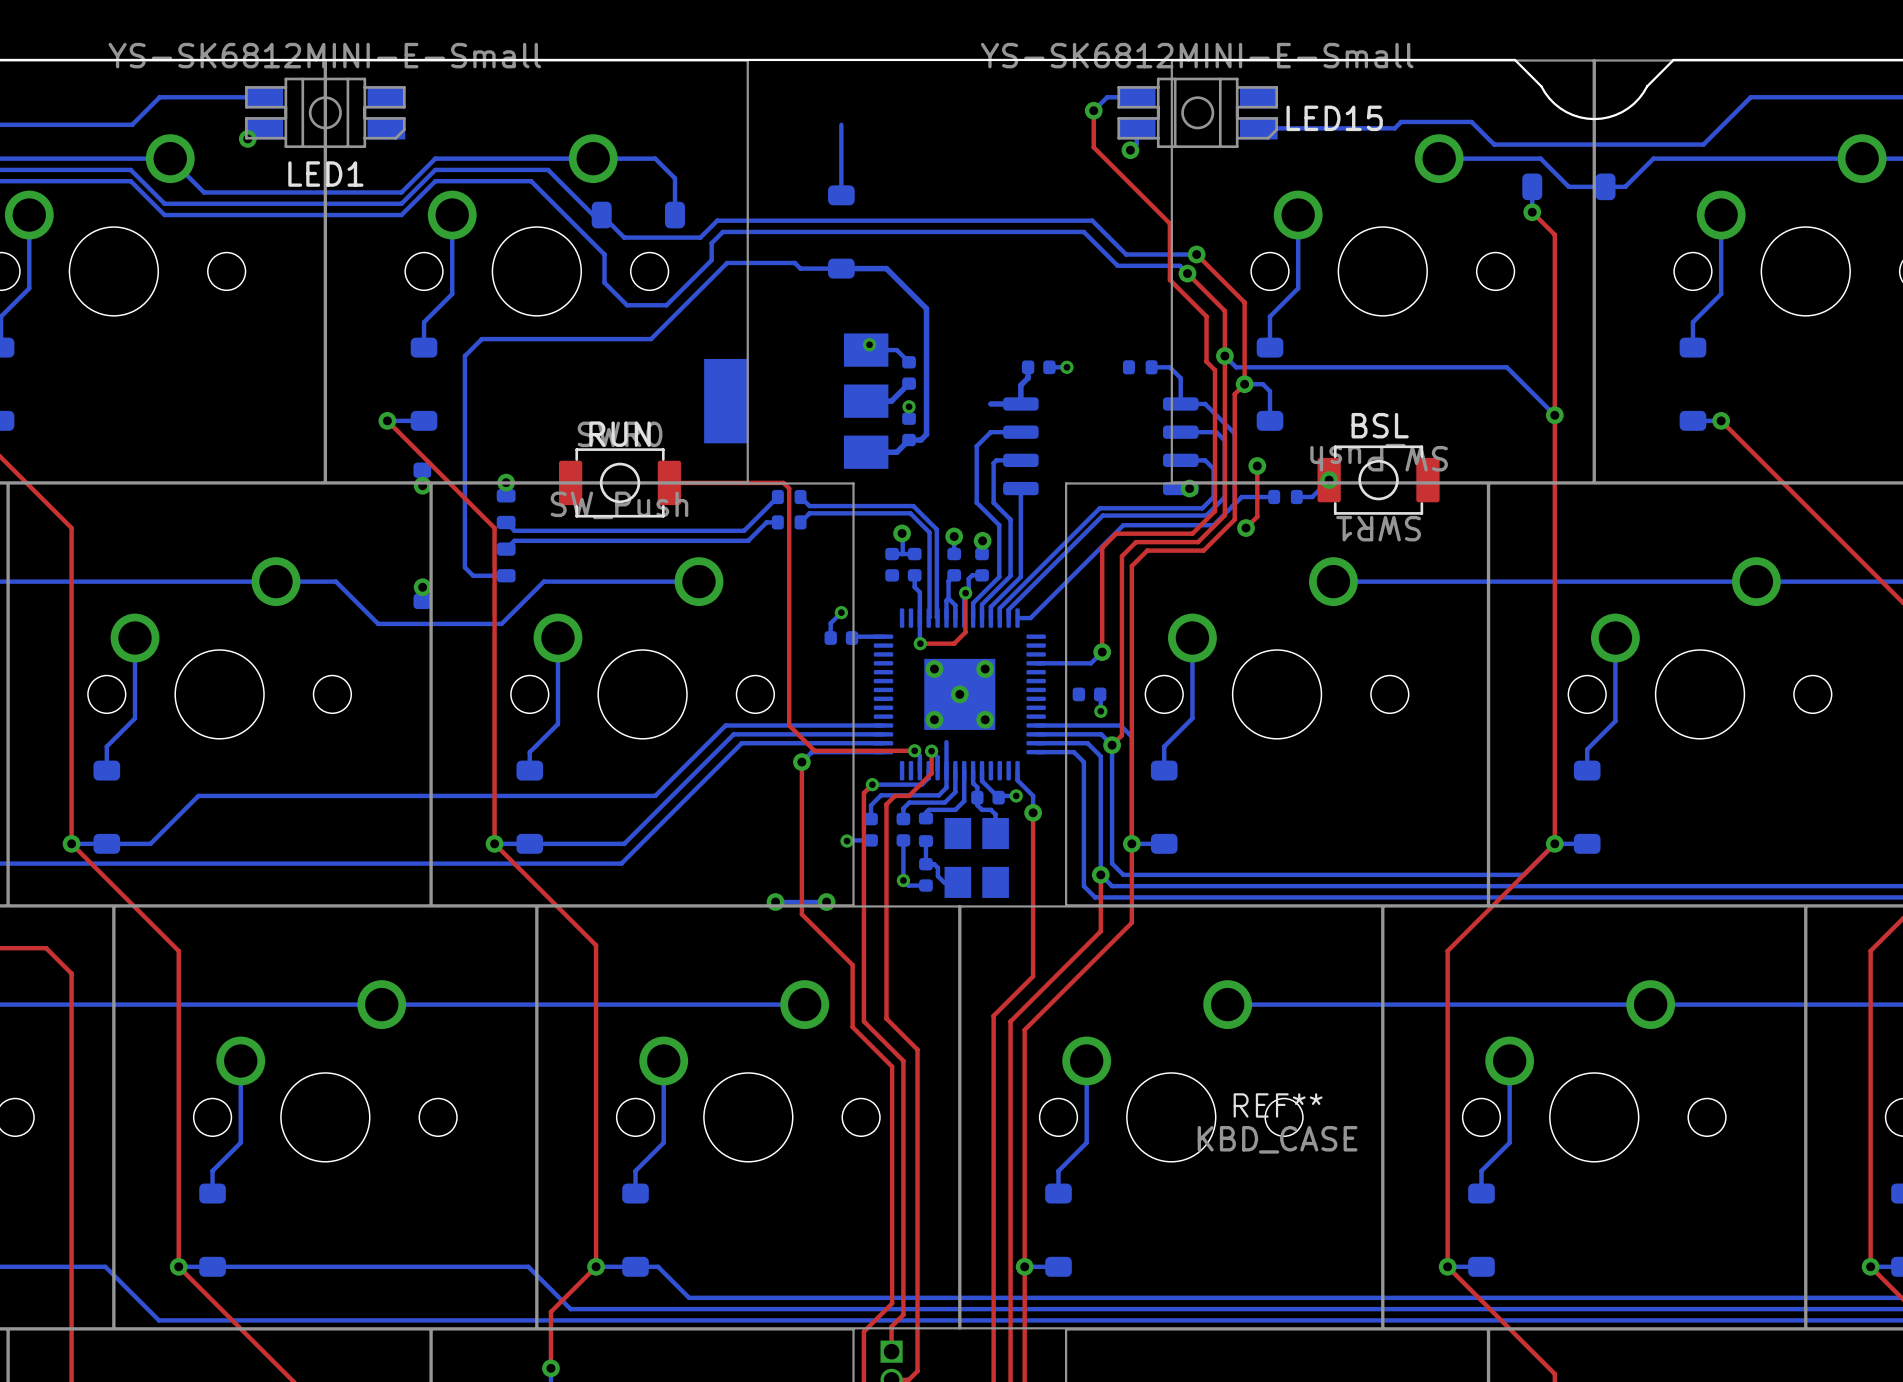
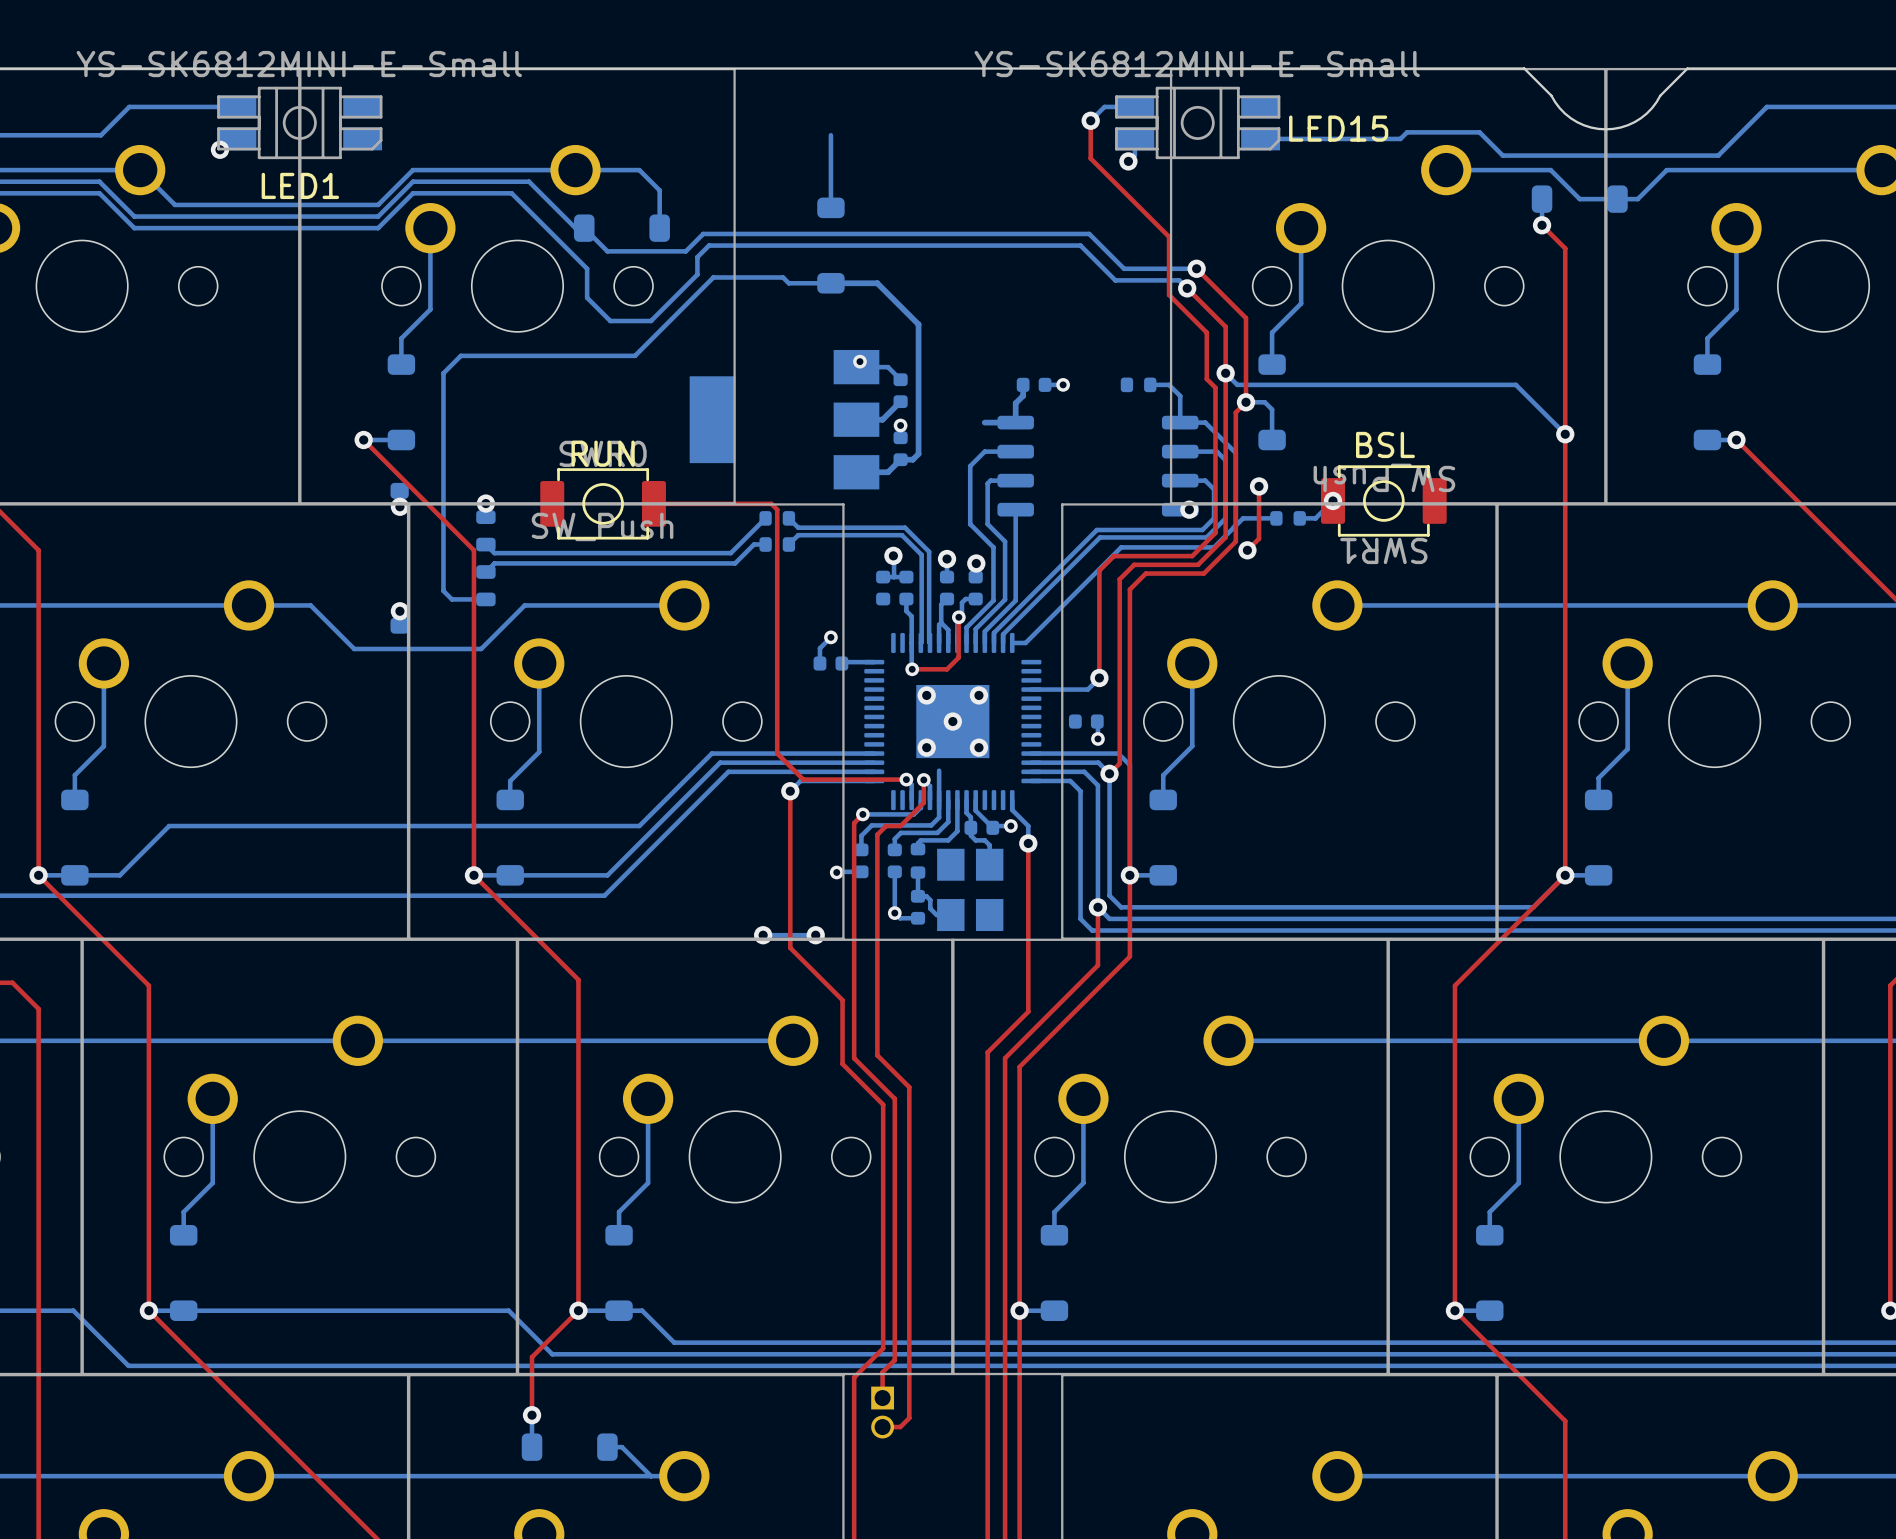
REF**: KBD_CASE (1277, 1123) -> none

